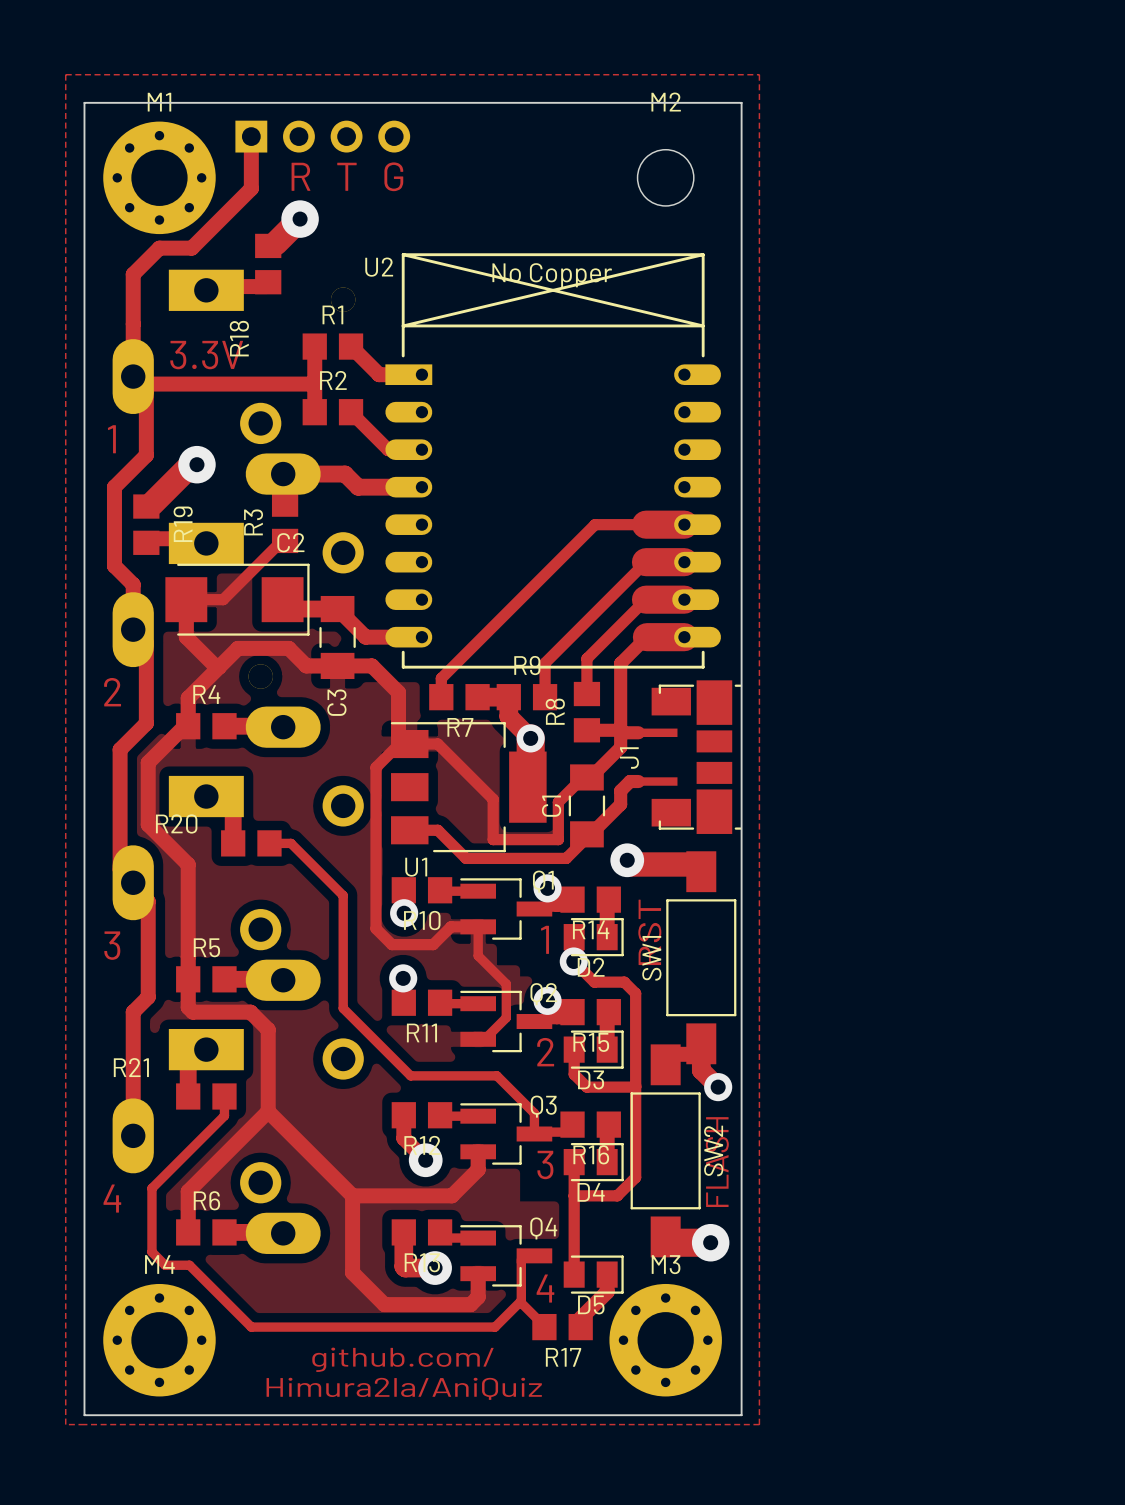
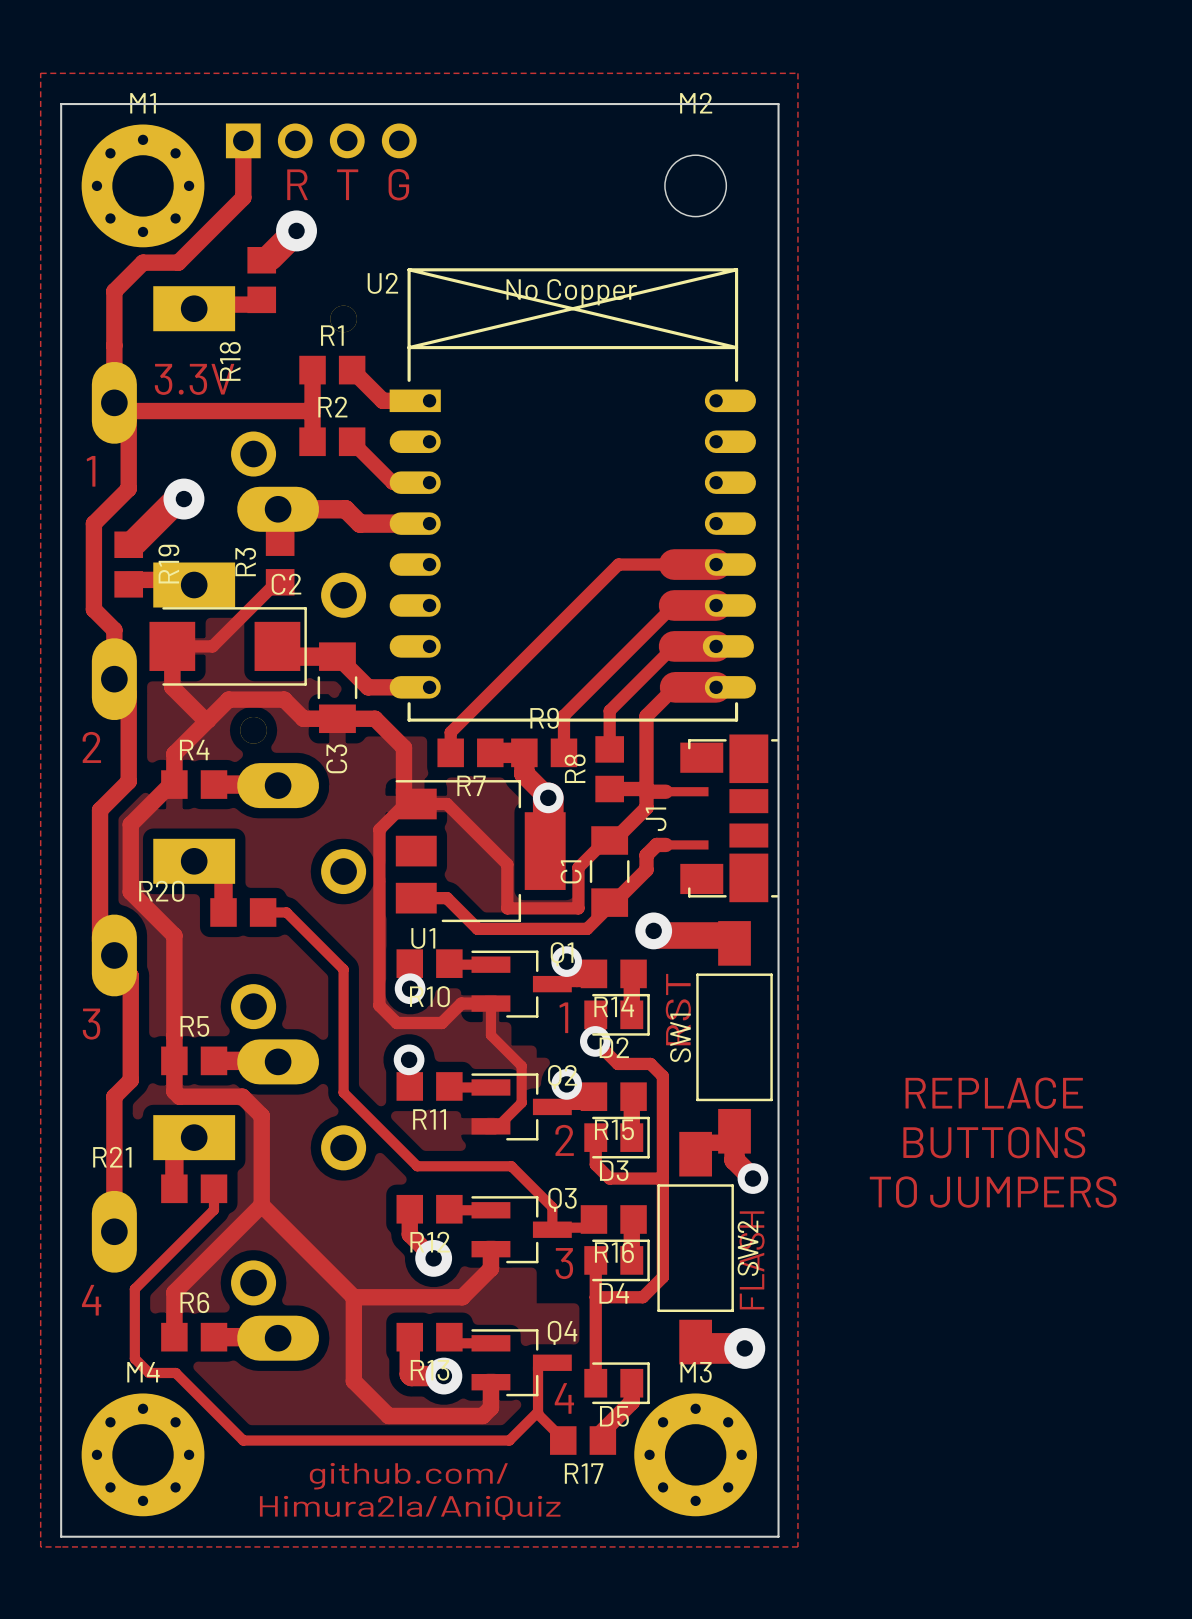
text: none -> REPLACE (994, 1093)
text: none -> BUTTONS (994, 1142)
text: none -> TO JUMPERS (993, 1192)

